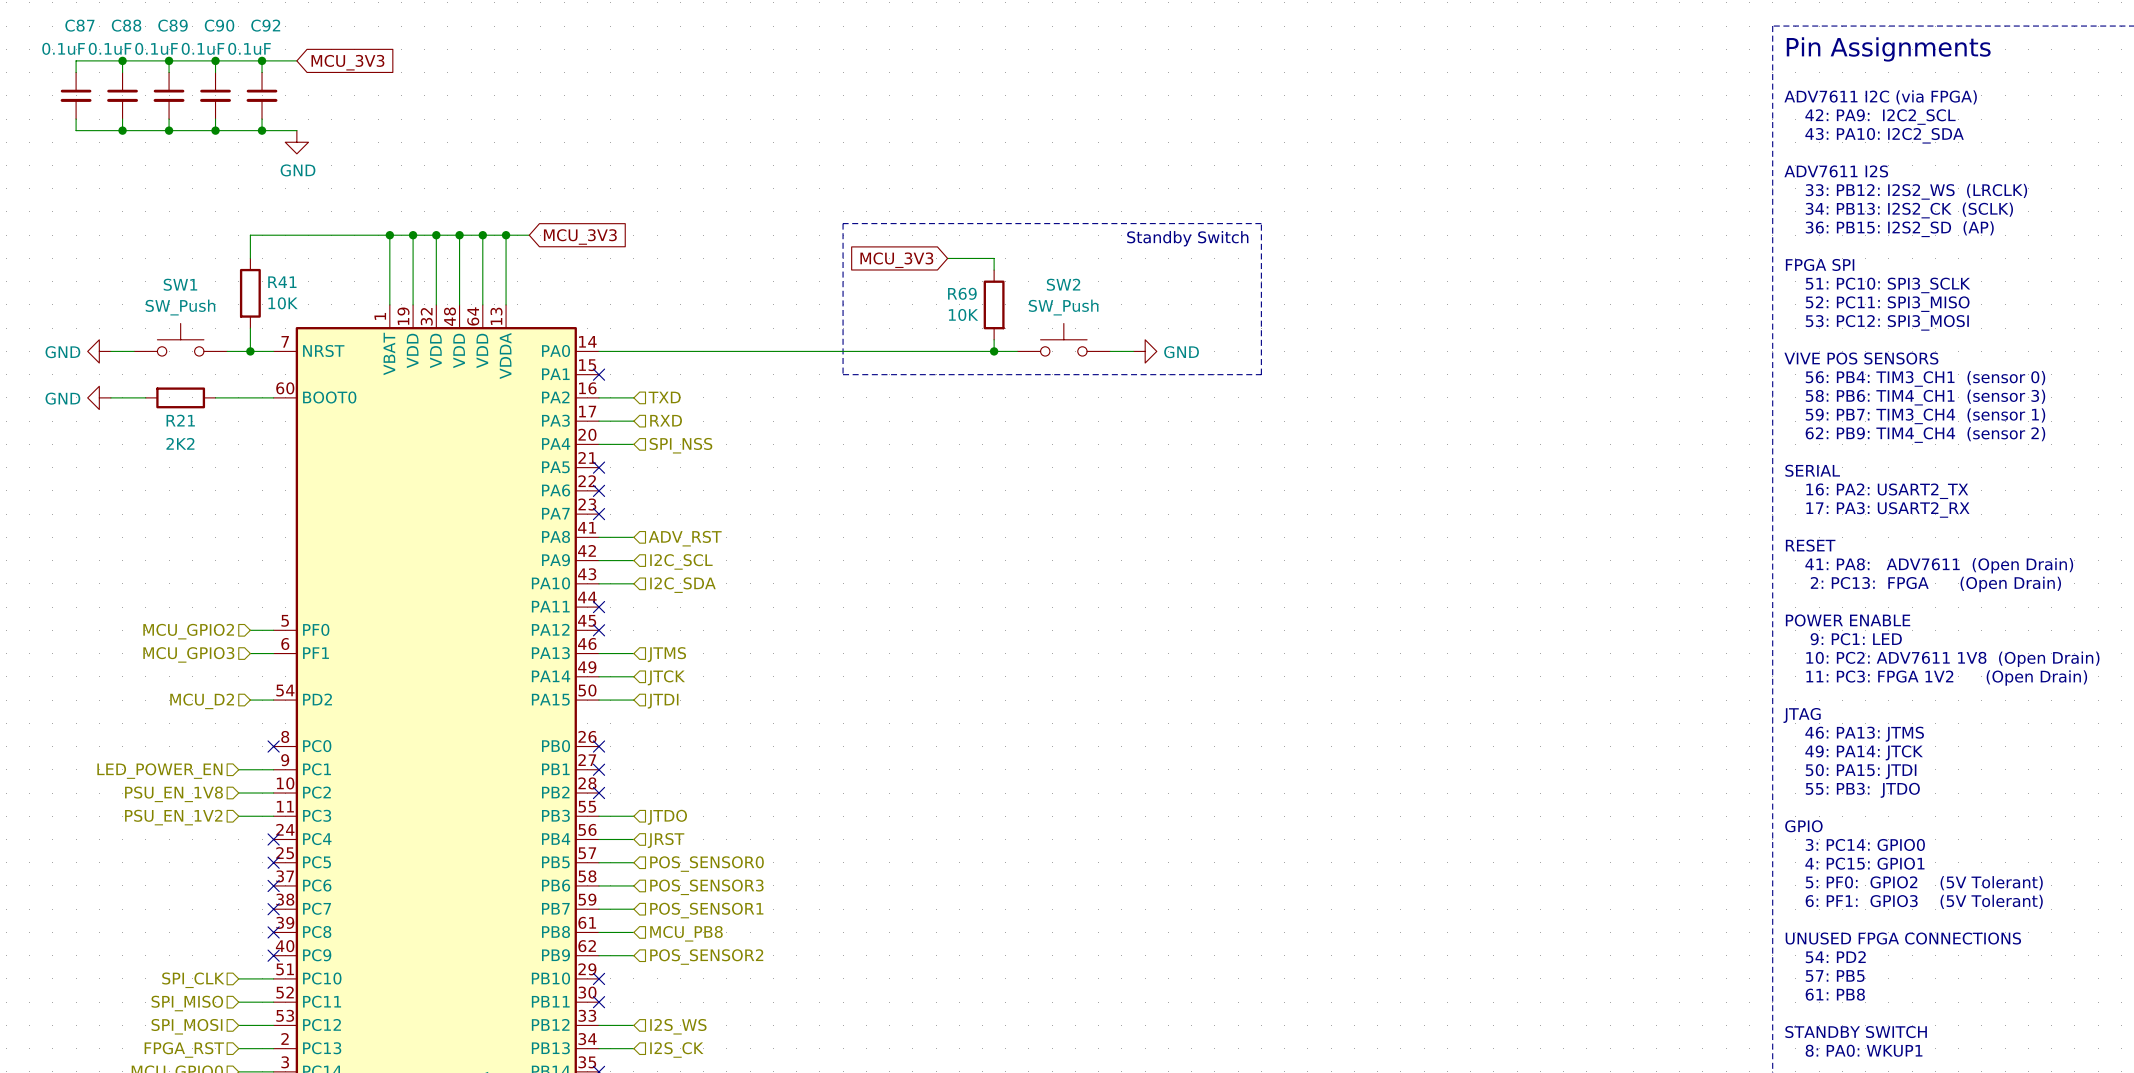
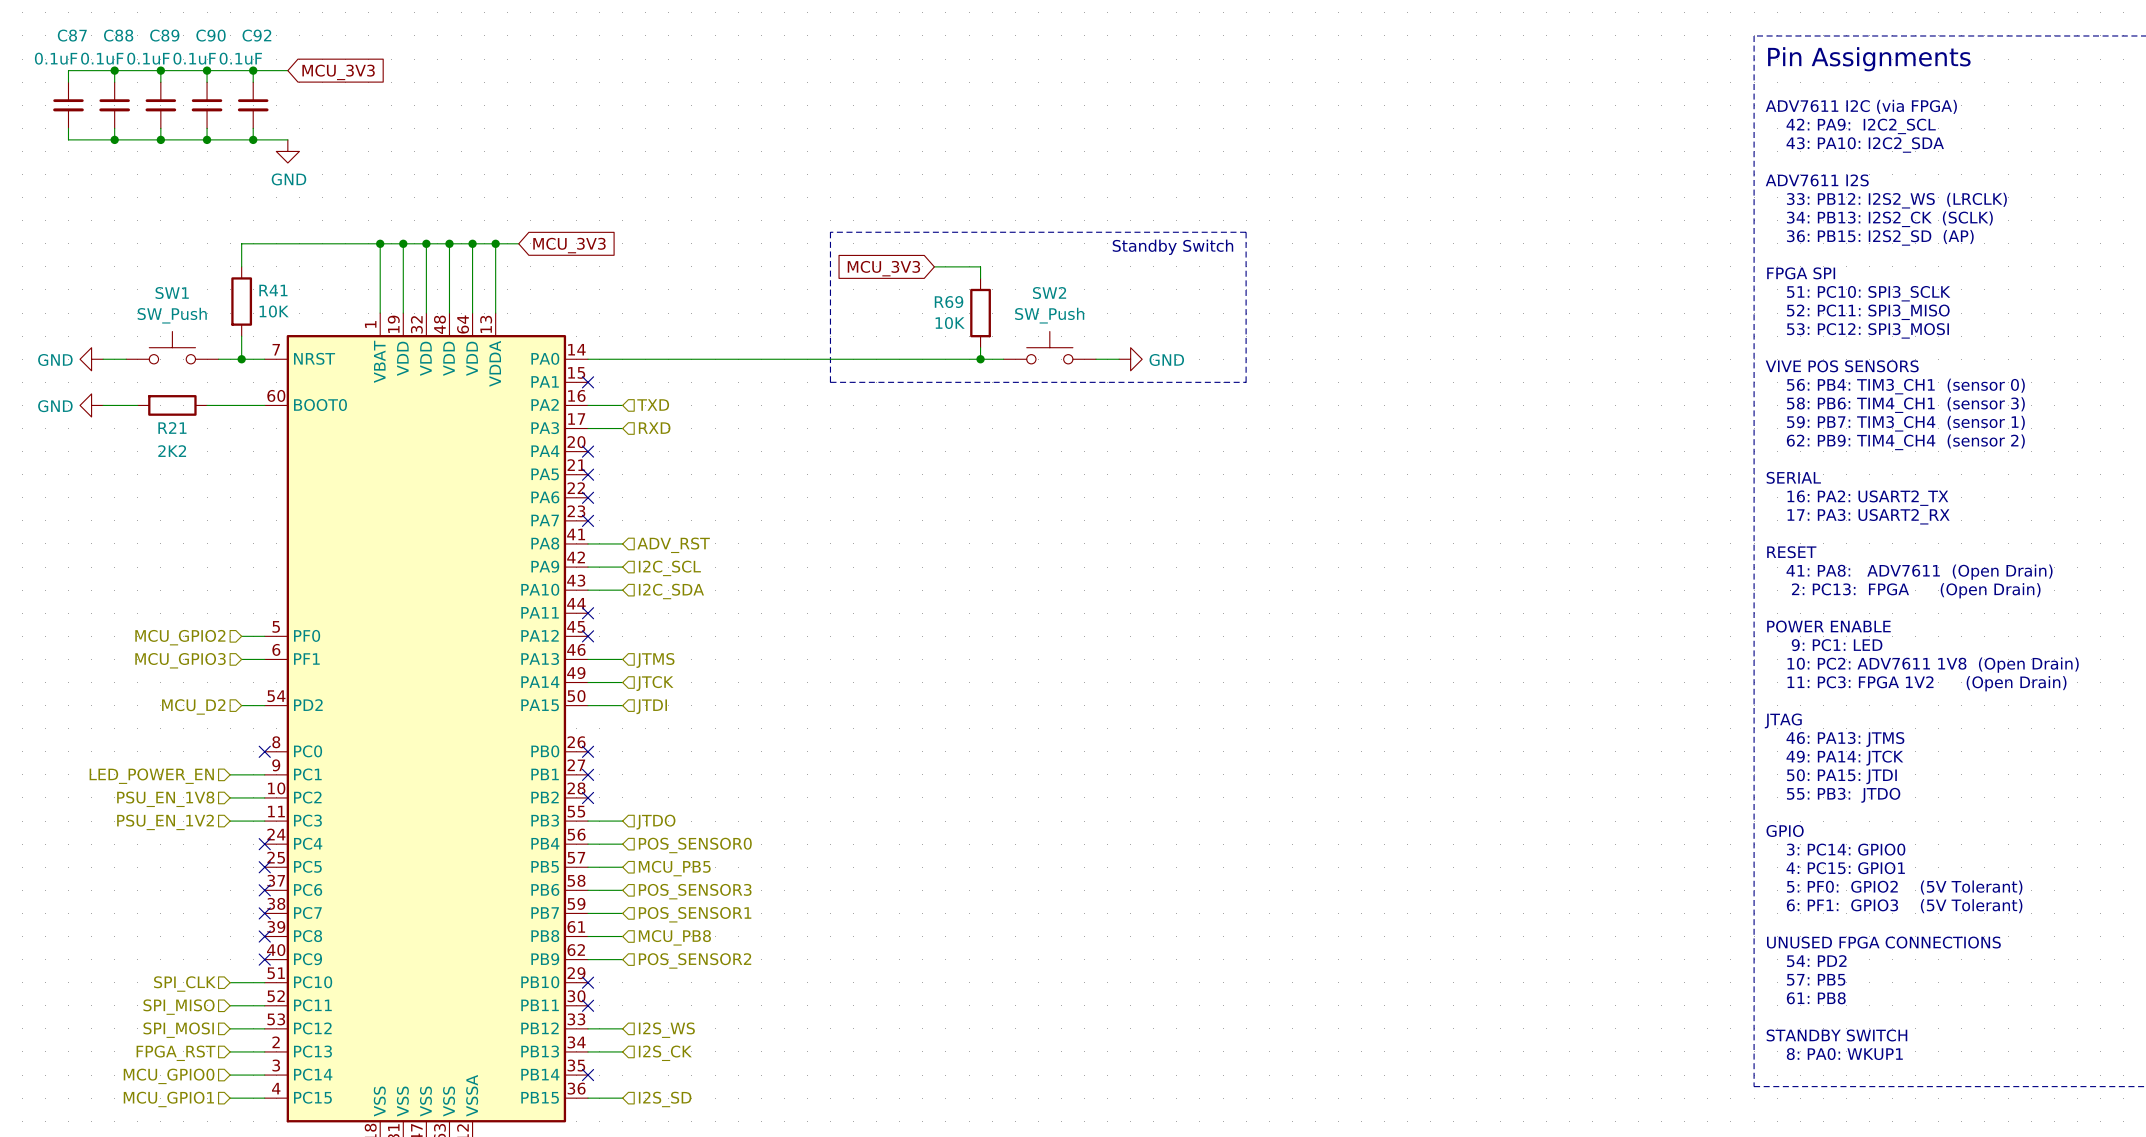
wire: (599, 444) (633, 444) -> none
no-connect mark: none -> (588, 451)
hierarchical label: SPI_NSS (680, 445) -> none
hierarchical label: JRST (666, 840) -> POS_SENSOR0 (695, 845)
hierarchical label: POS_SENSOR0 (707, 864) -> MCU_PB5 (674, 868)

